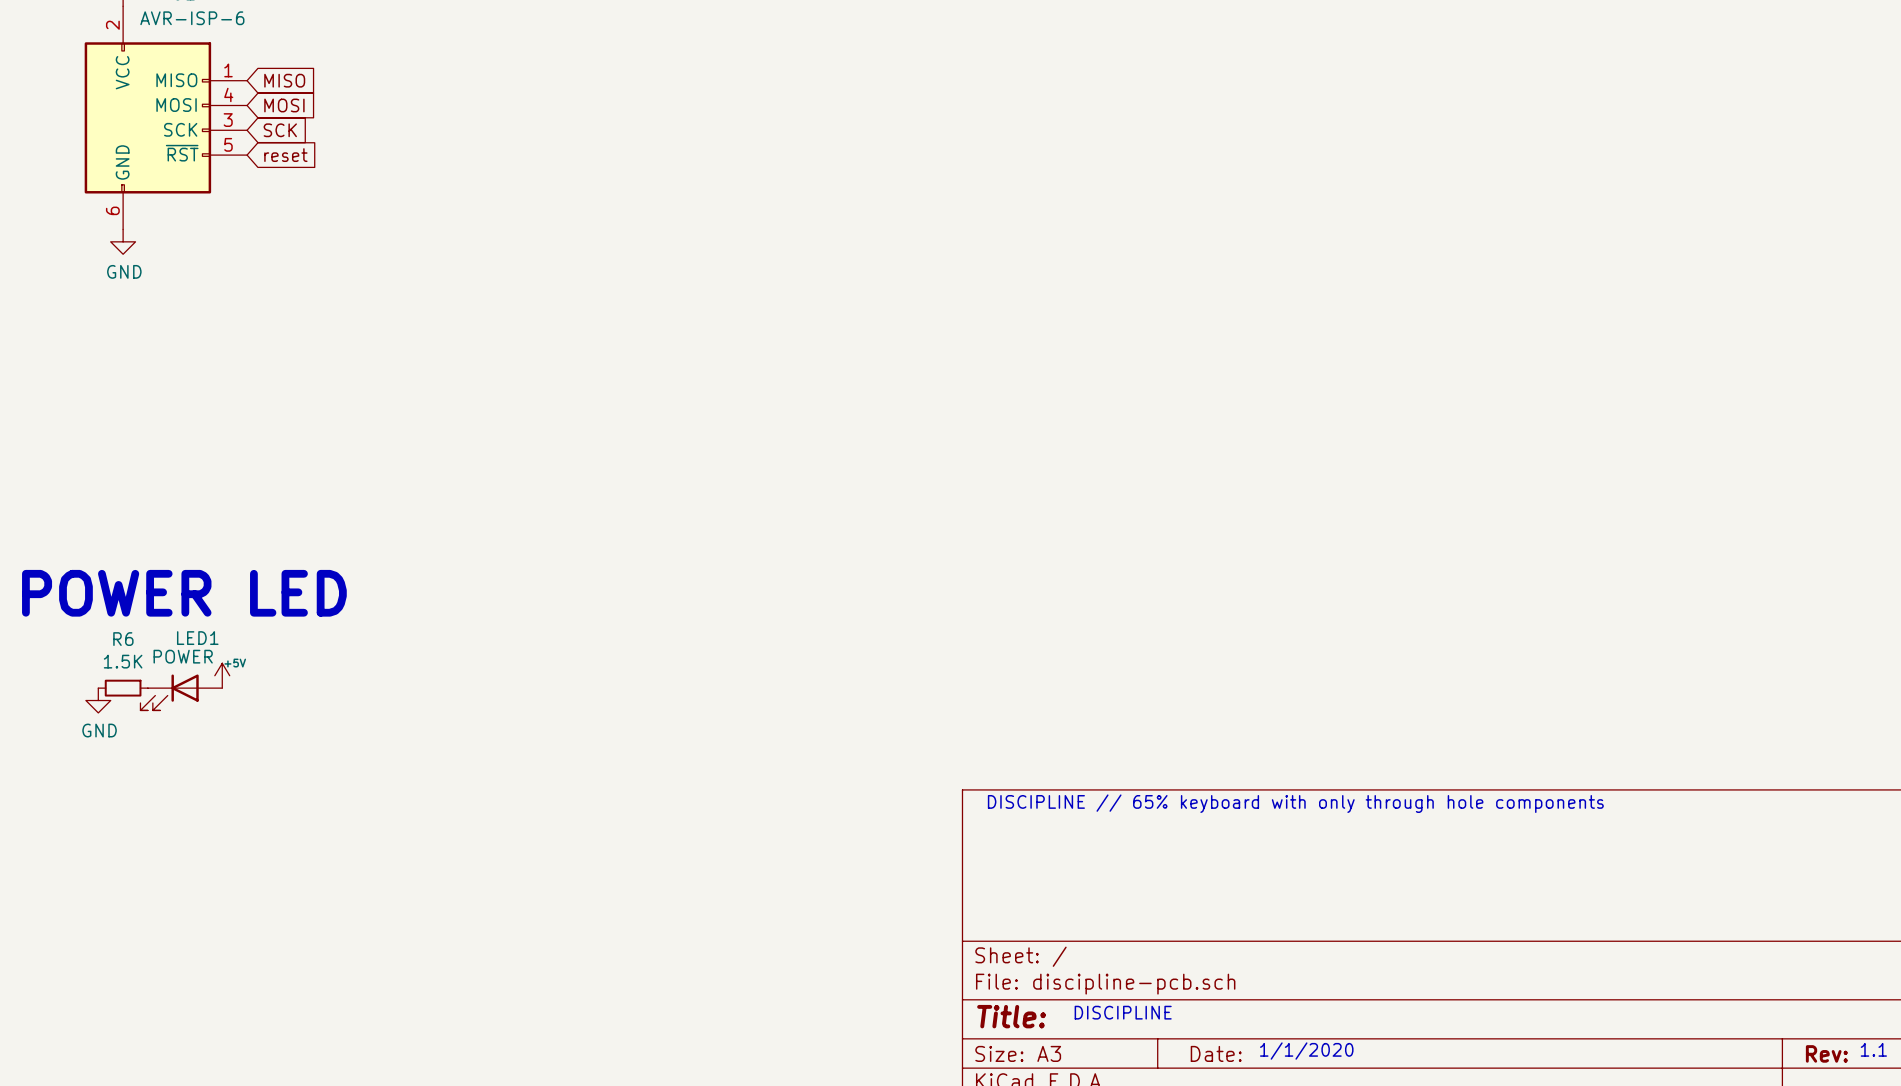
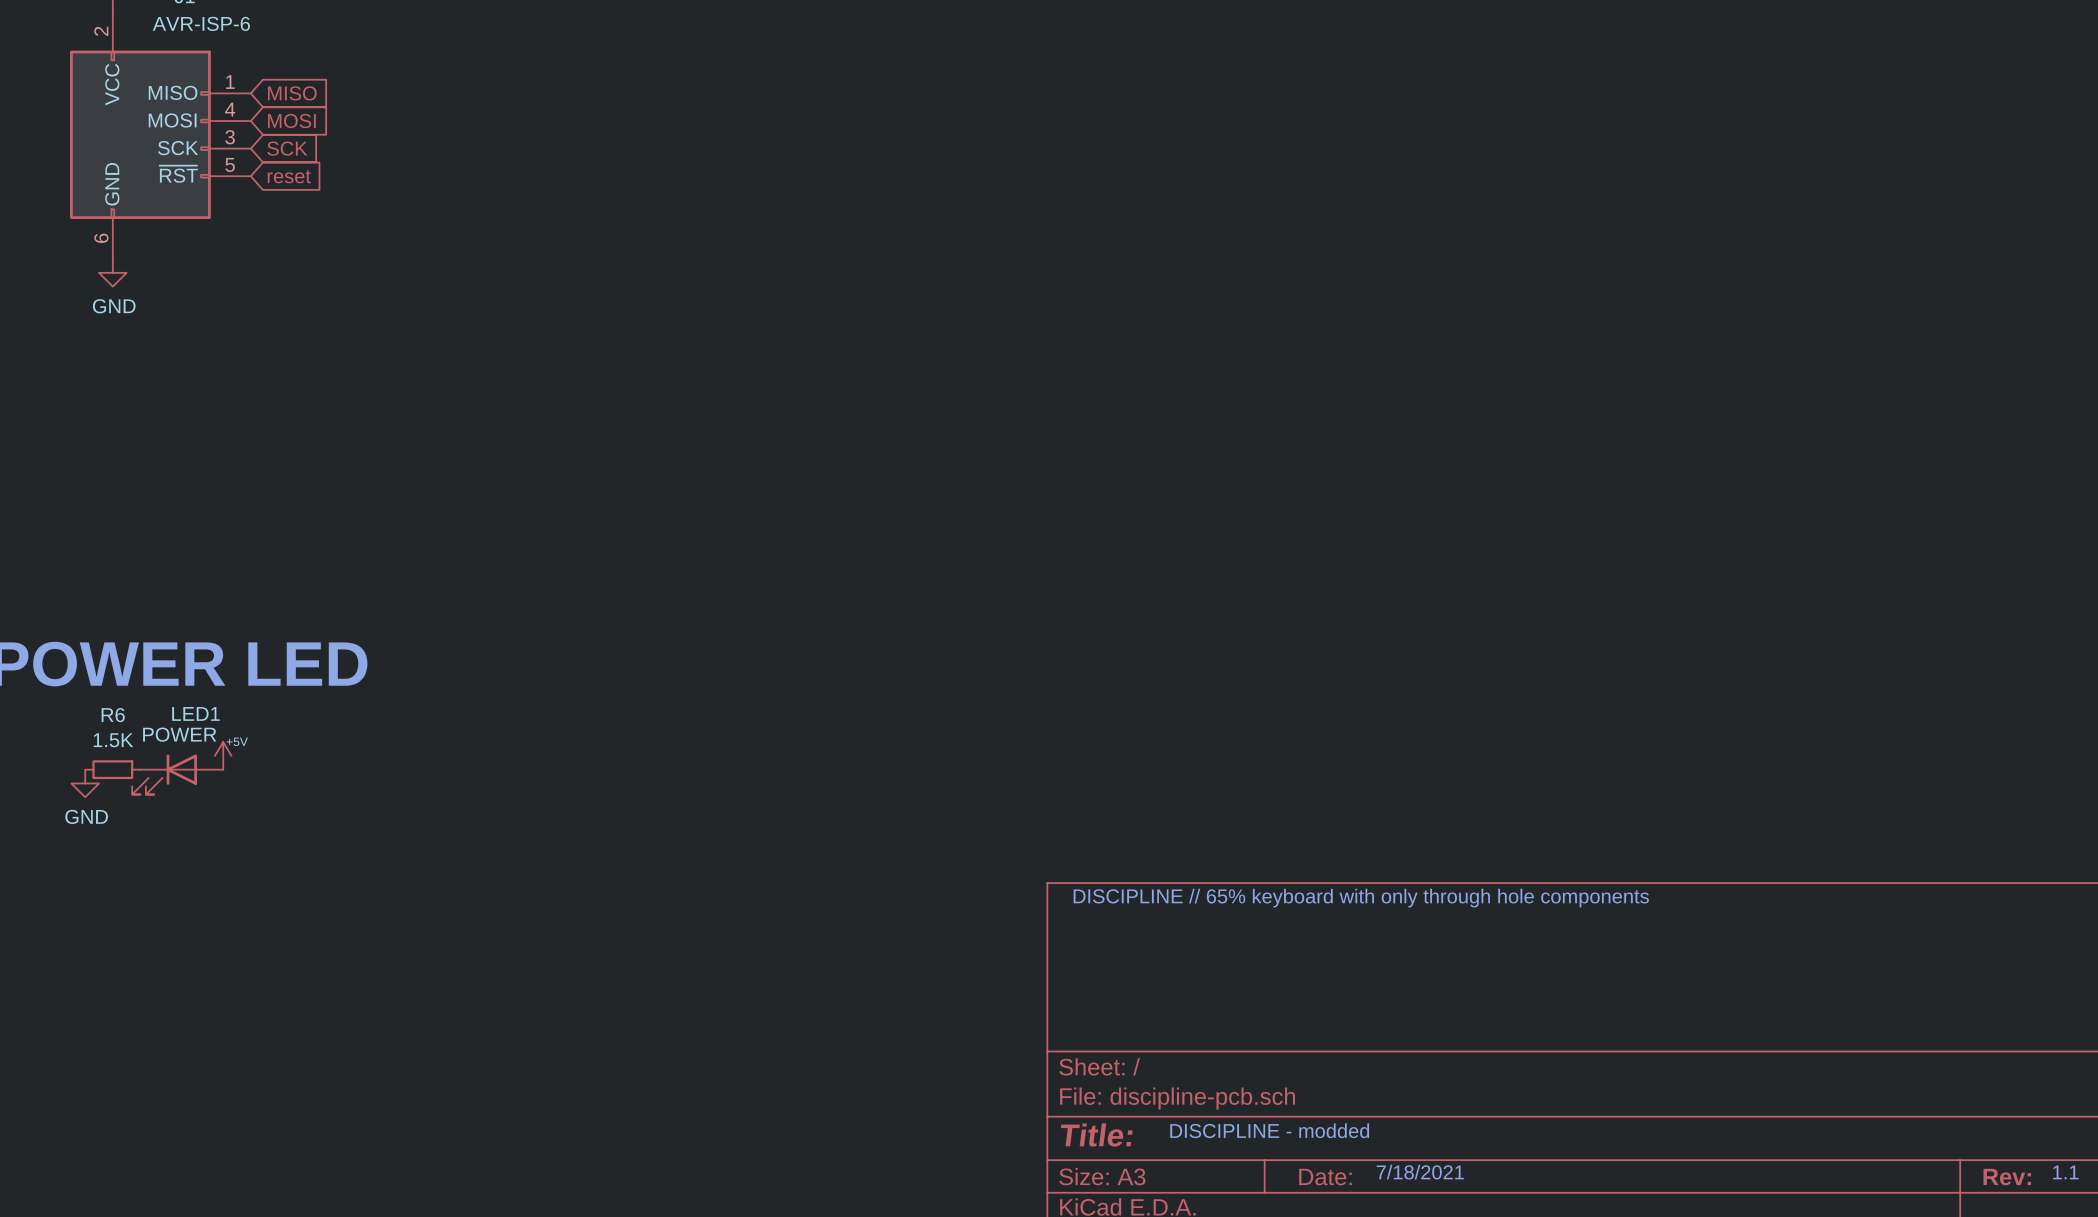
text: DISCIPLINE (1123, 1012) -> DISCIPLINE - modded (1269, 1130)
text: 1/1/2020 (1306, 1051) -> 7/18/2021 (1420, 1172)

